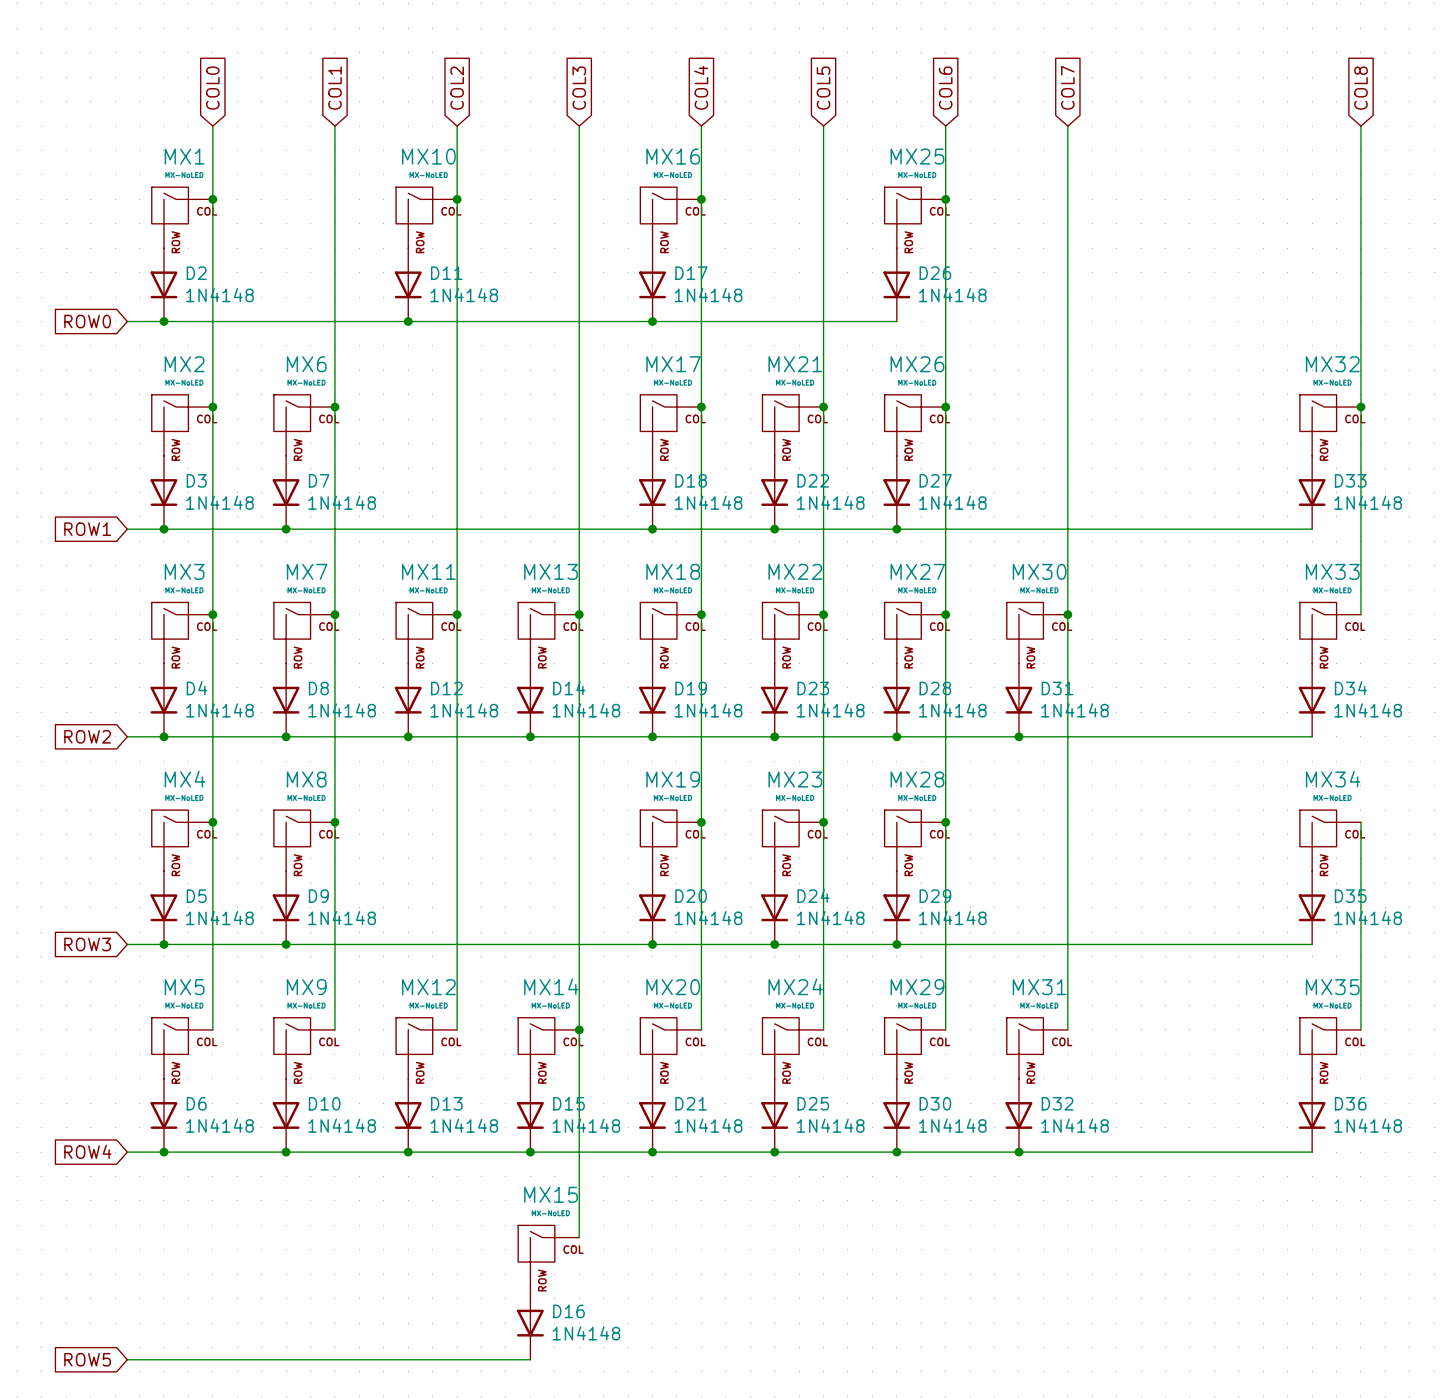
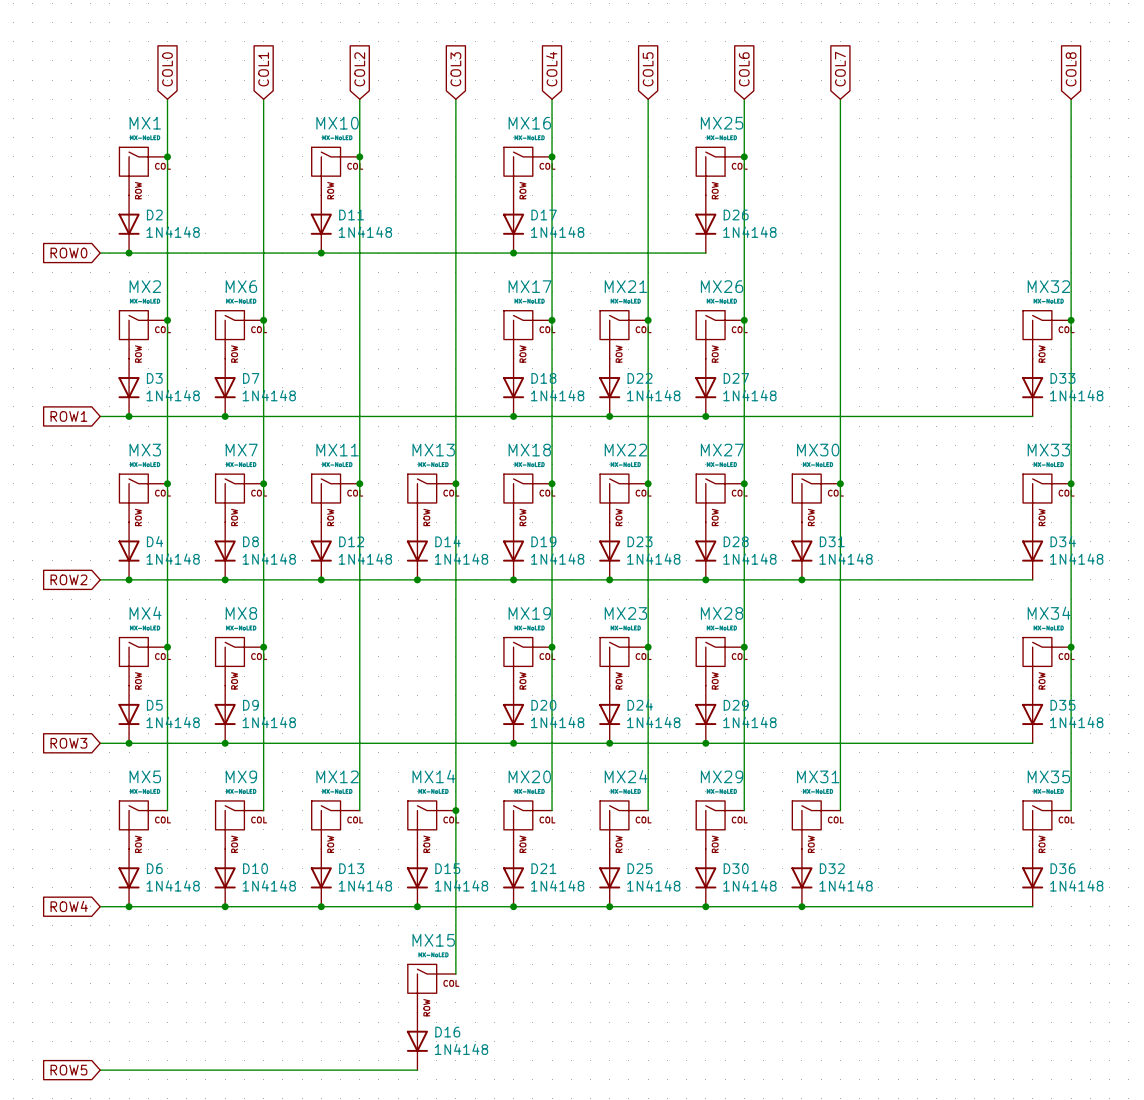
wire: none -> (1071, 483) (1071, 647)
junction: none -> (1071, 483)
junction: none -> (1071, 647)

